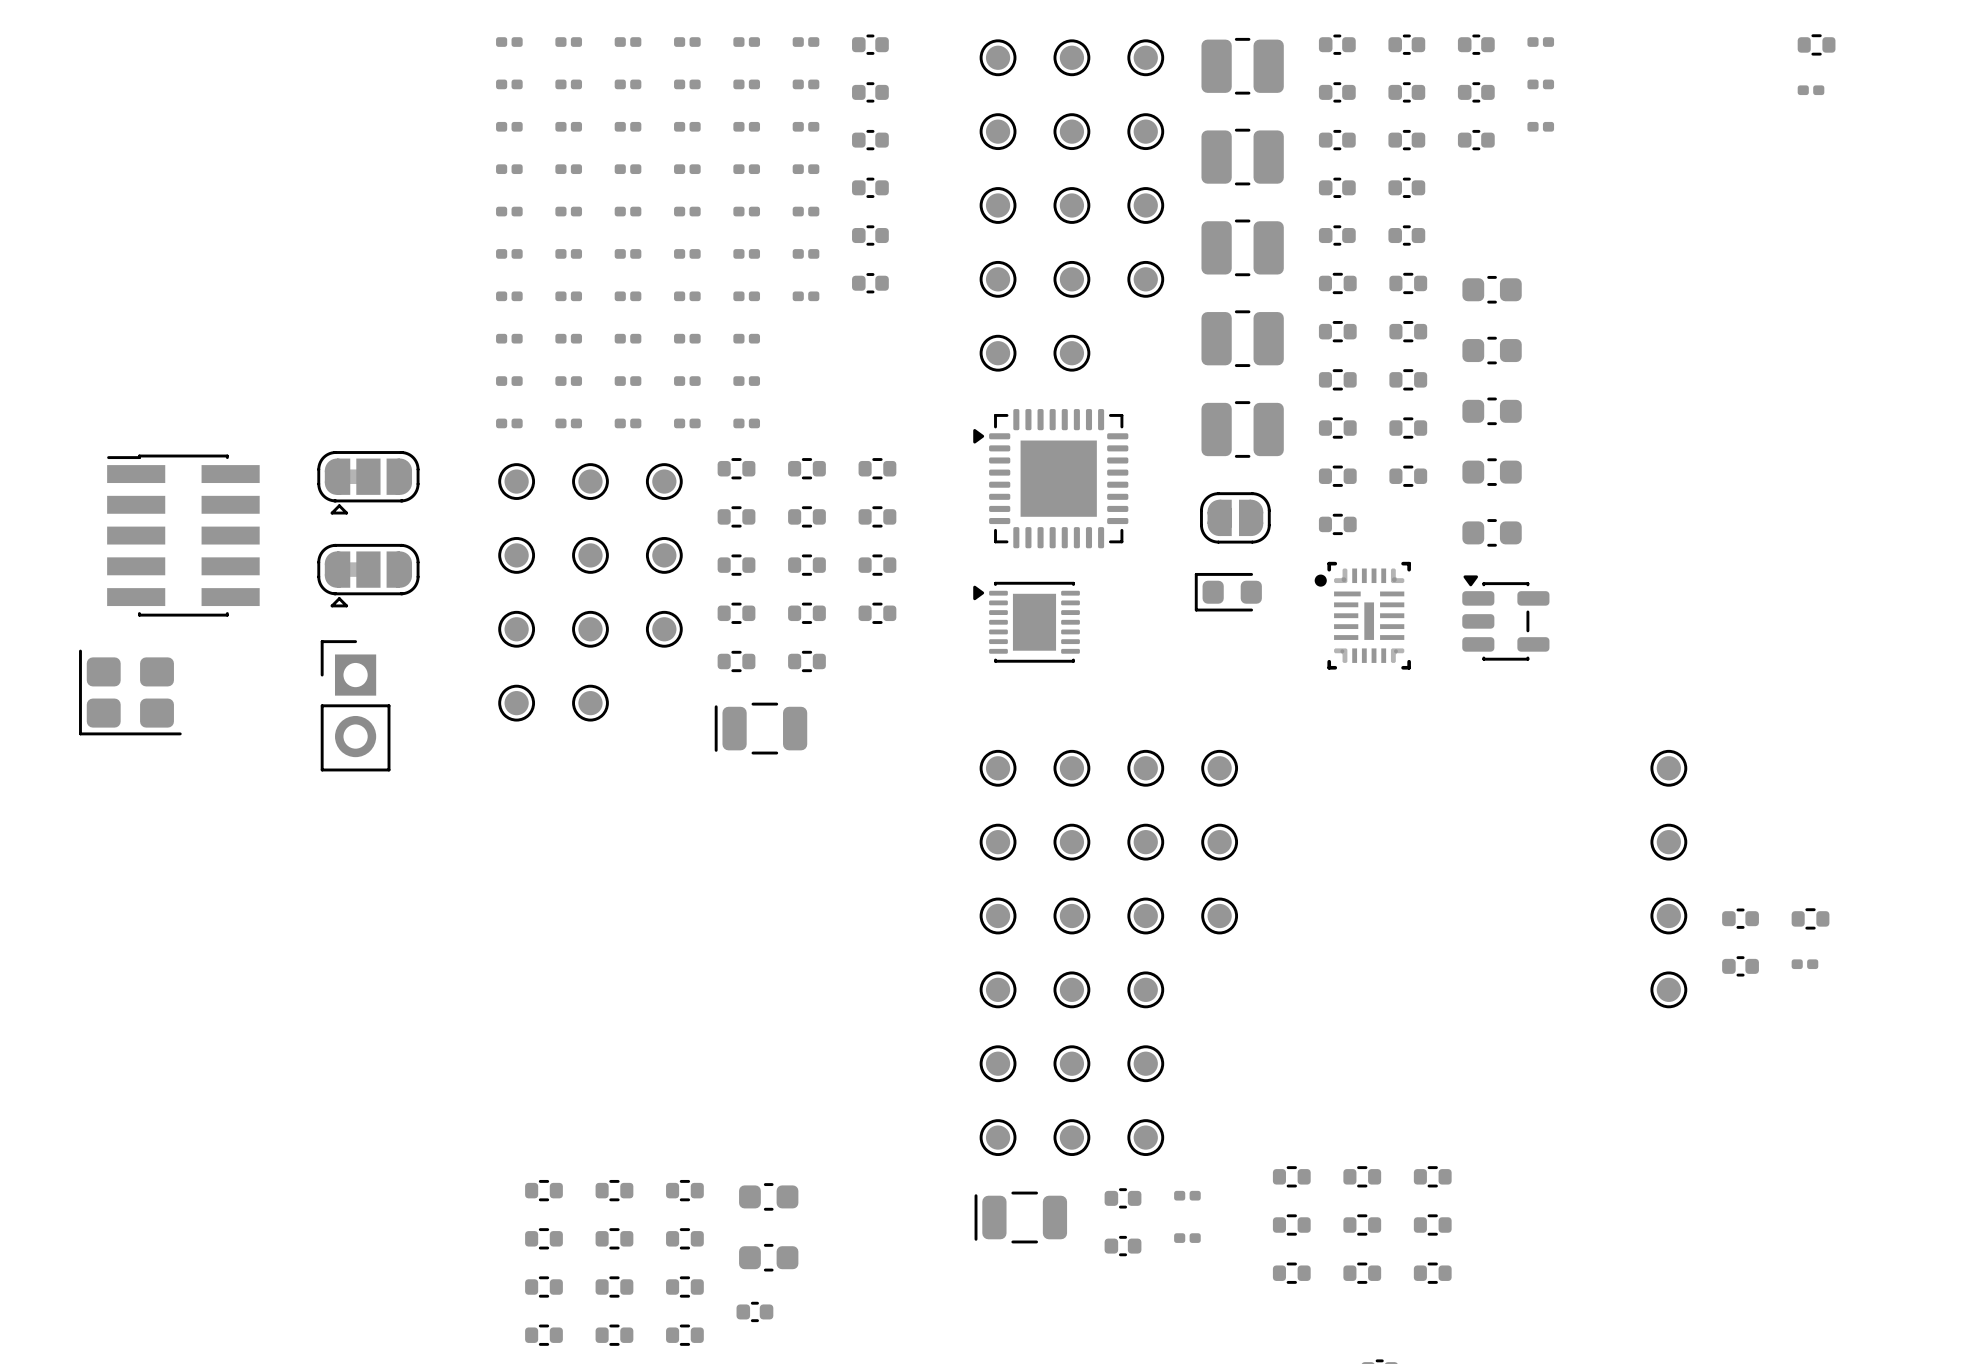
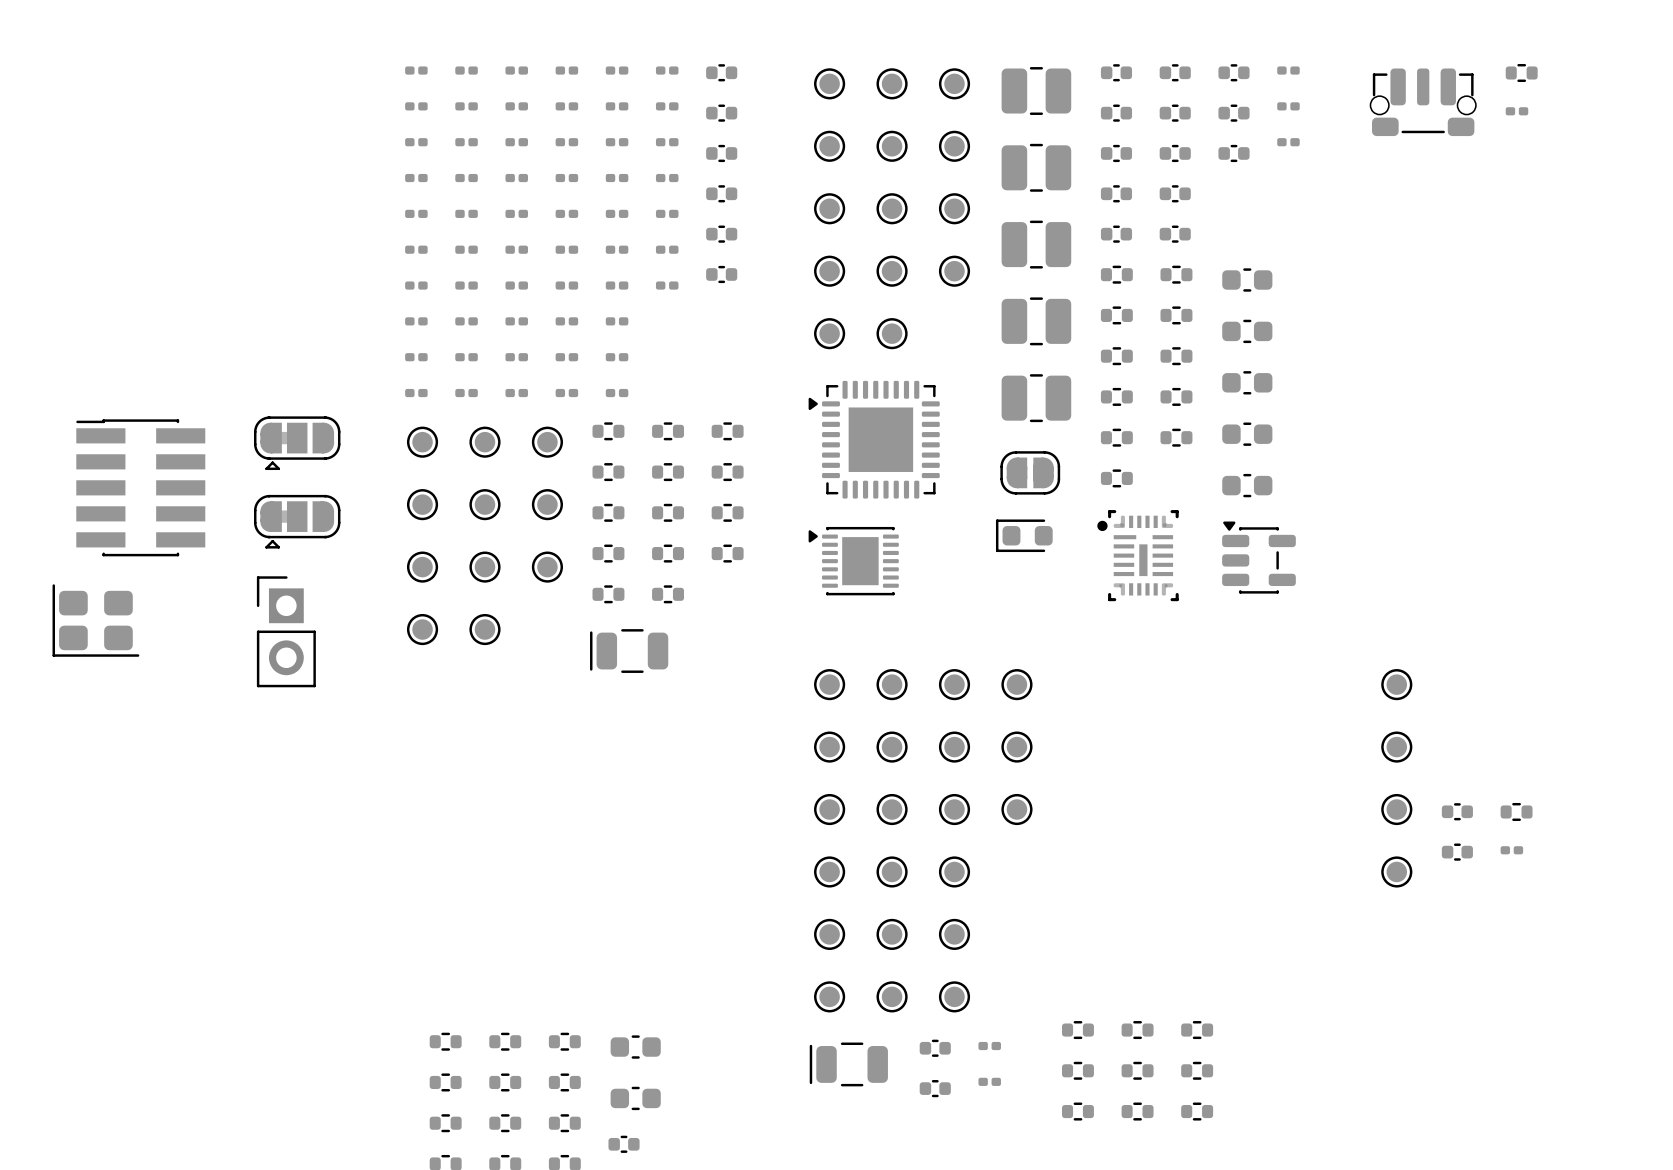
part: none -> (1423, 102)

